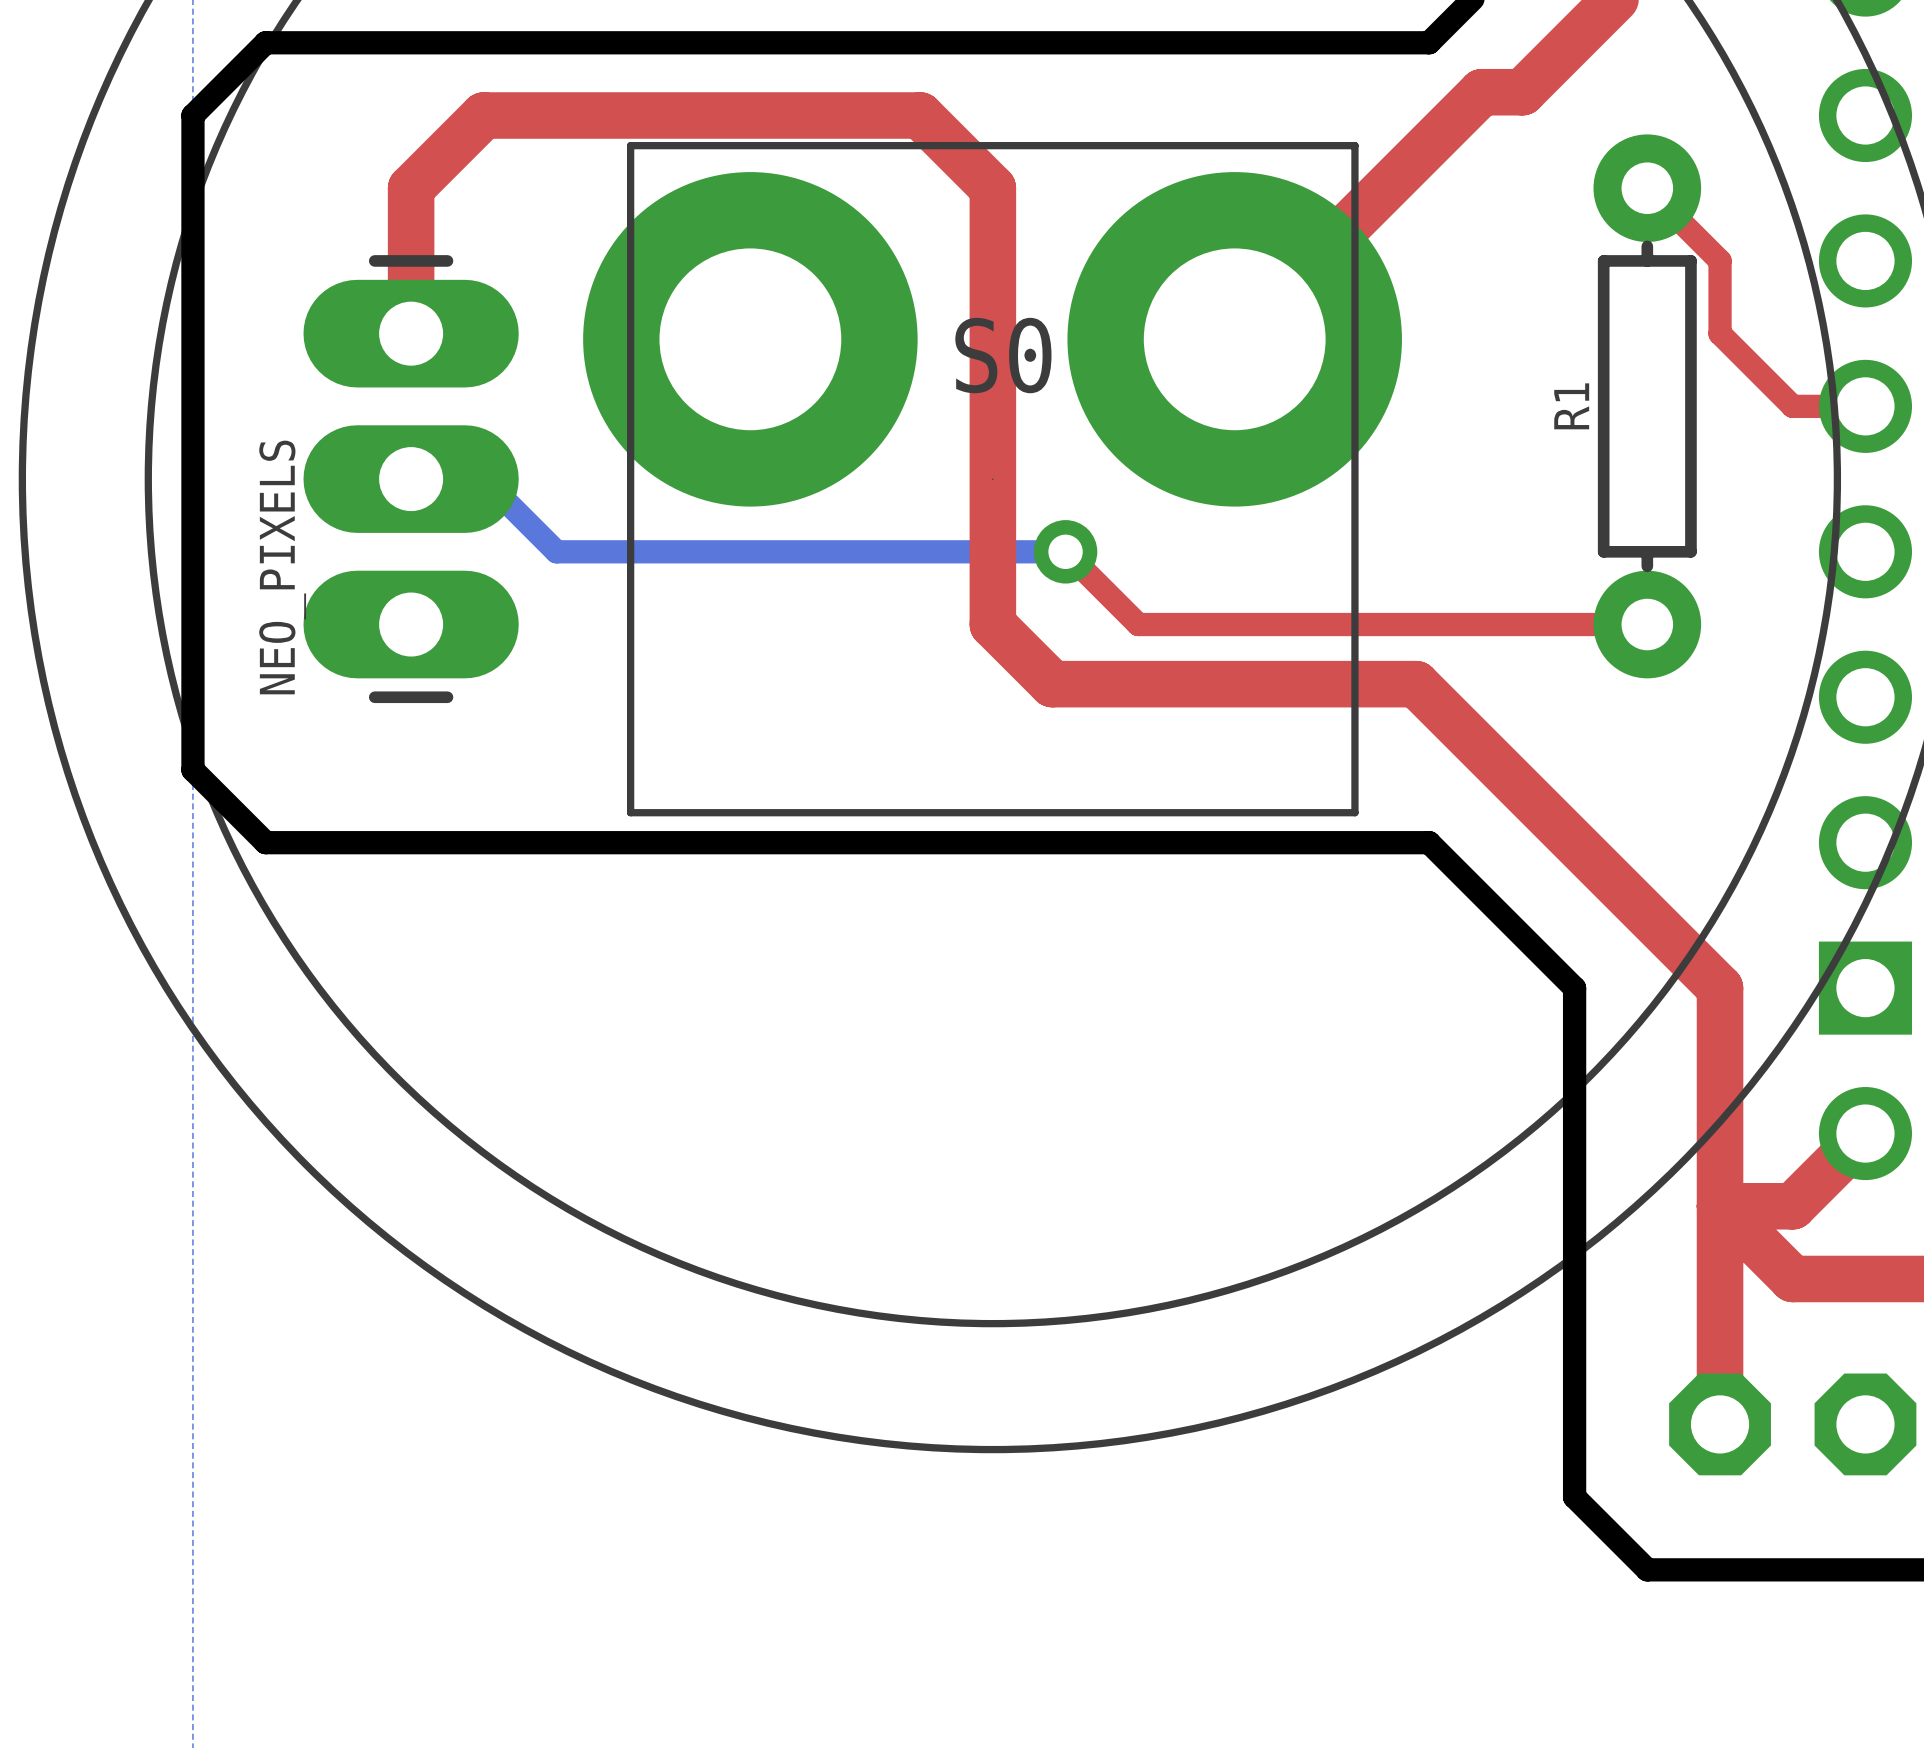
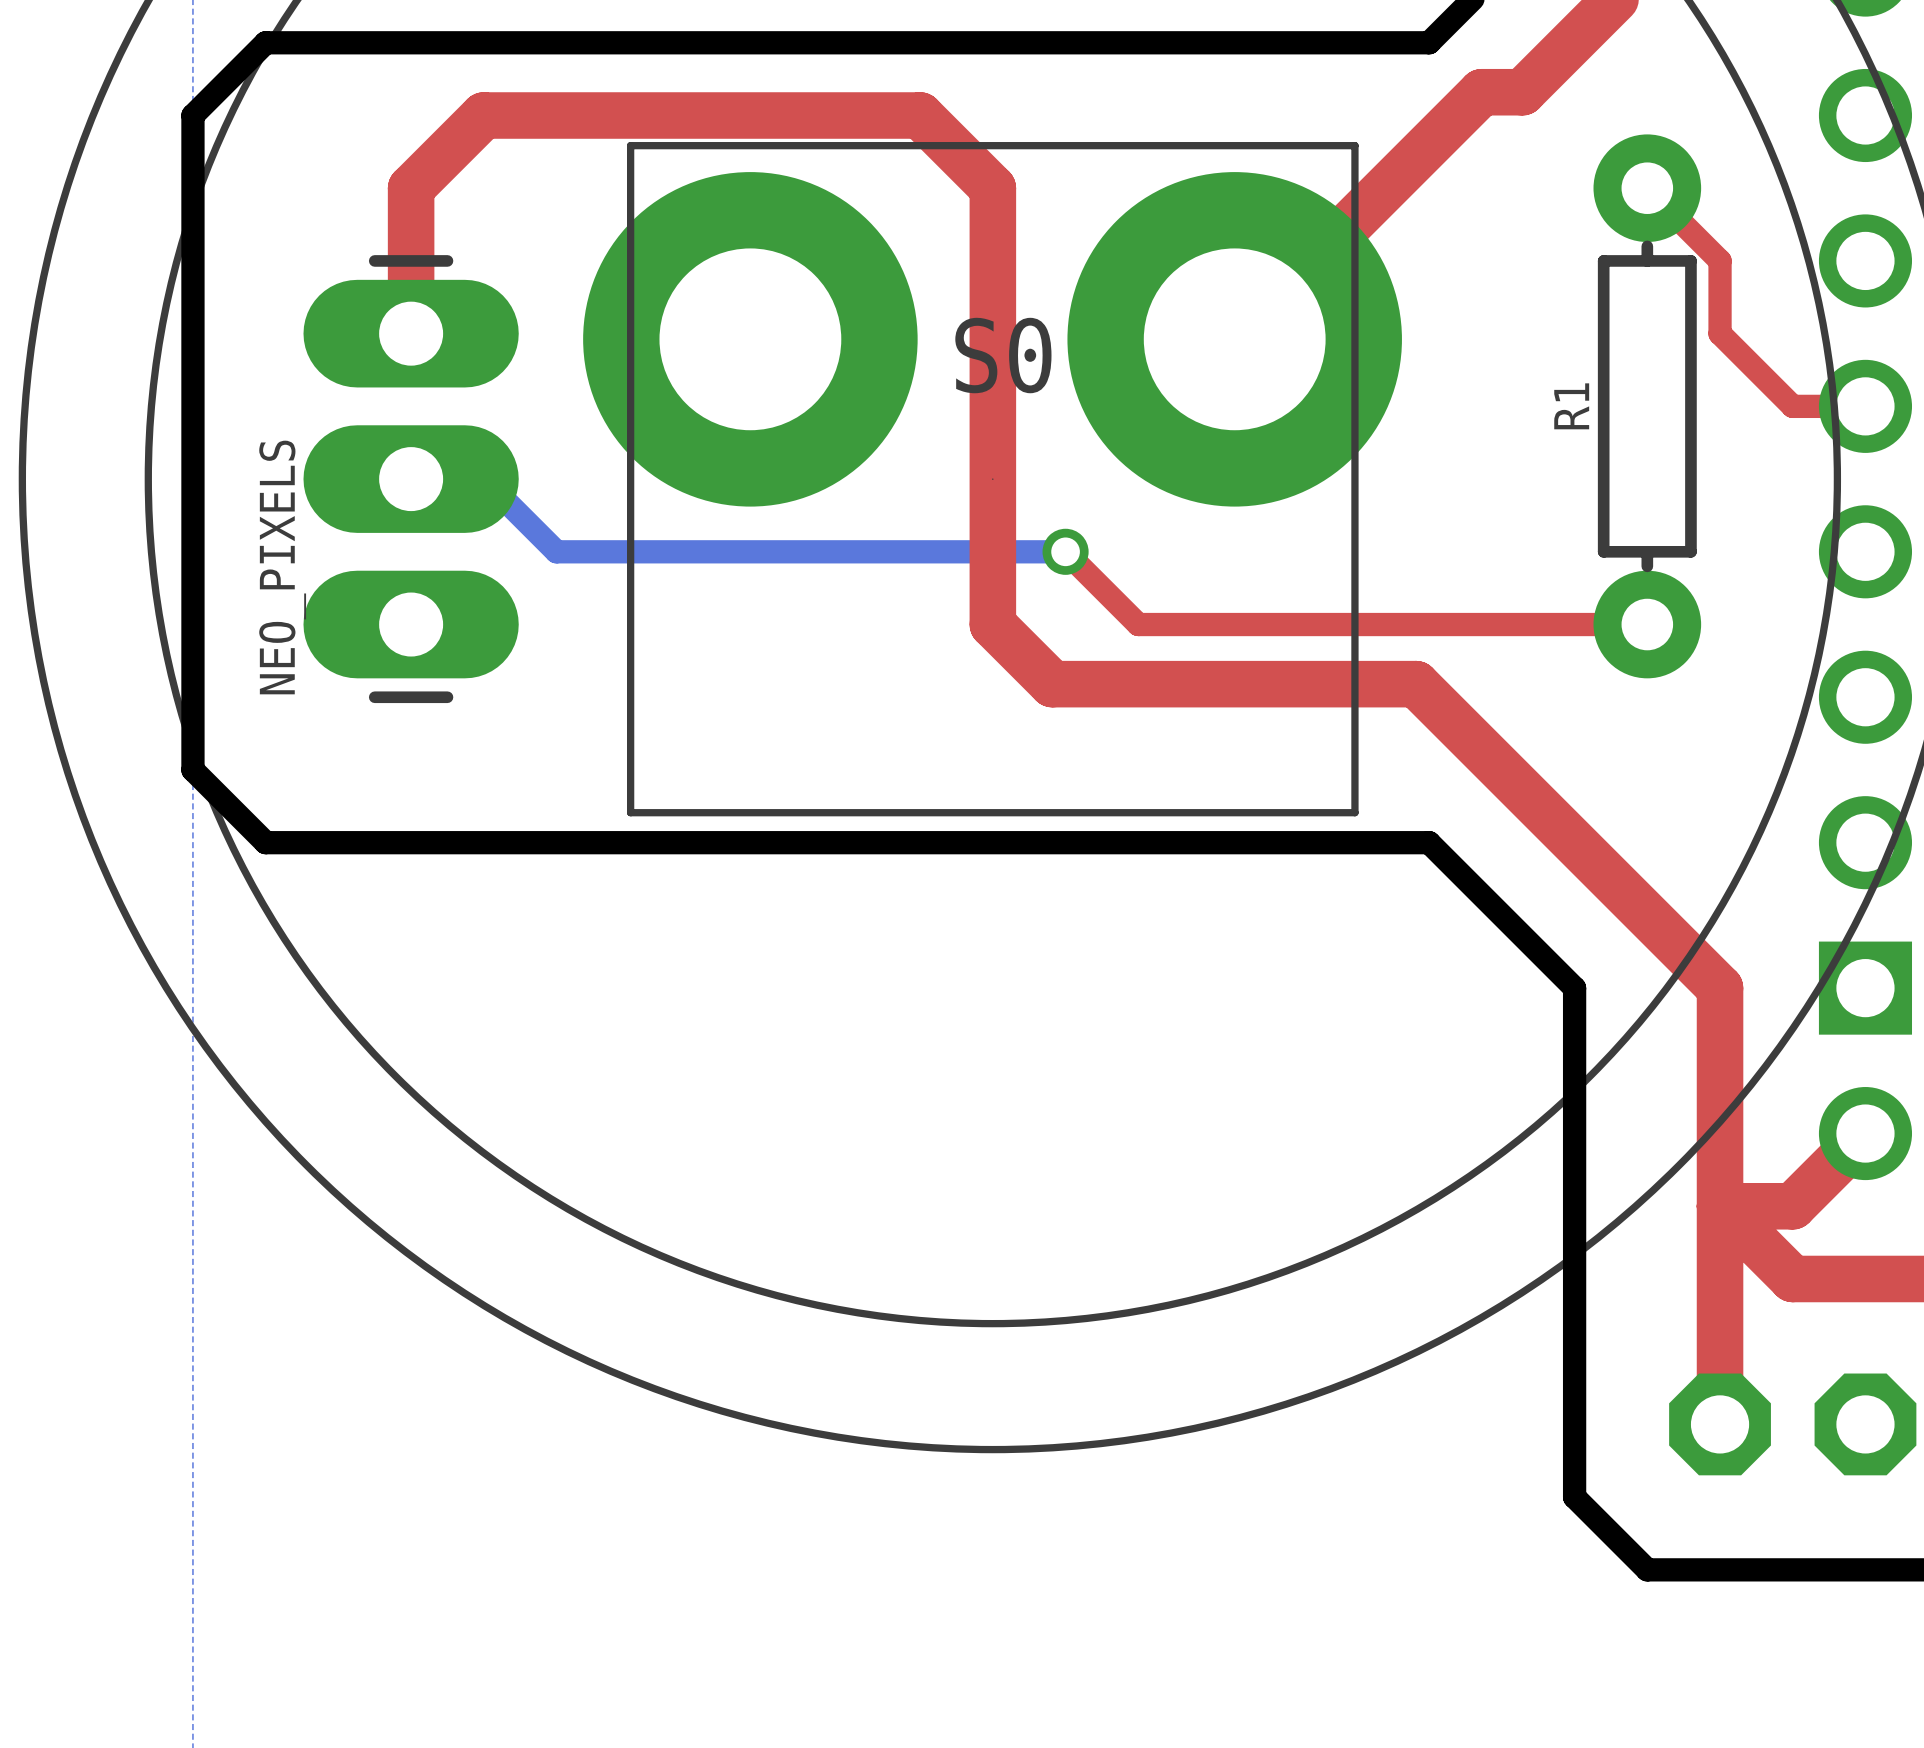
via size: [1033, 520, 1098, 584] -> [1042, 528, 1089, 575]

